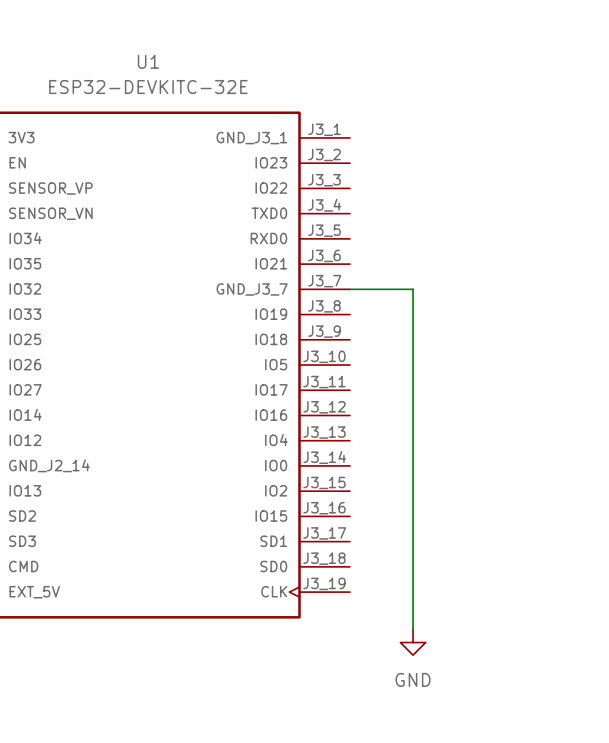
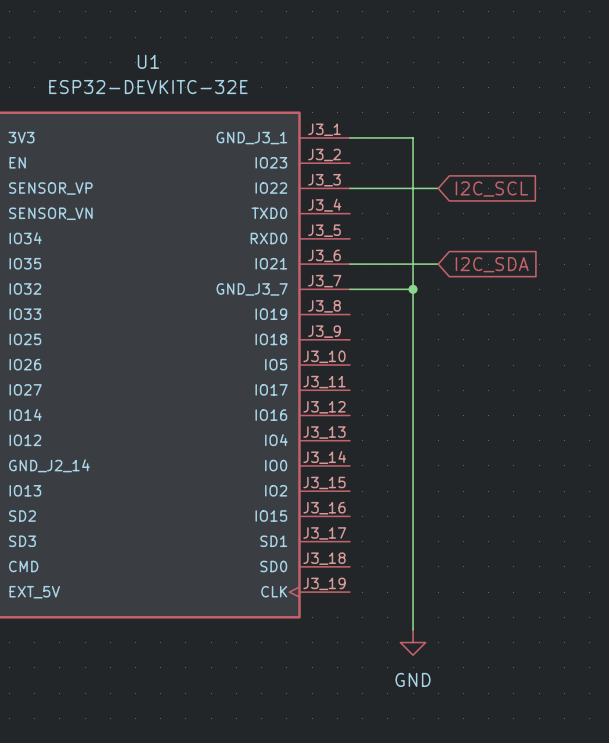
wire: none -> (349, 137) (413, 137) (413, 289)
wire: none -> (349, 188) (438, 188)
global label: none -> I2C_SCL (491, 189)
wire: none -> (349, 264) (438, 264)
global label: none -> I2C_SDA (492, 264)
junction: none -> (413, 289)

